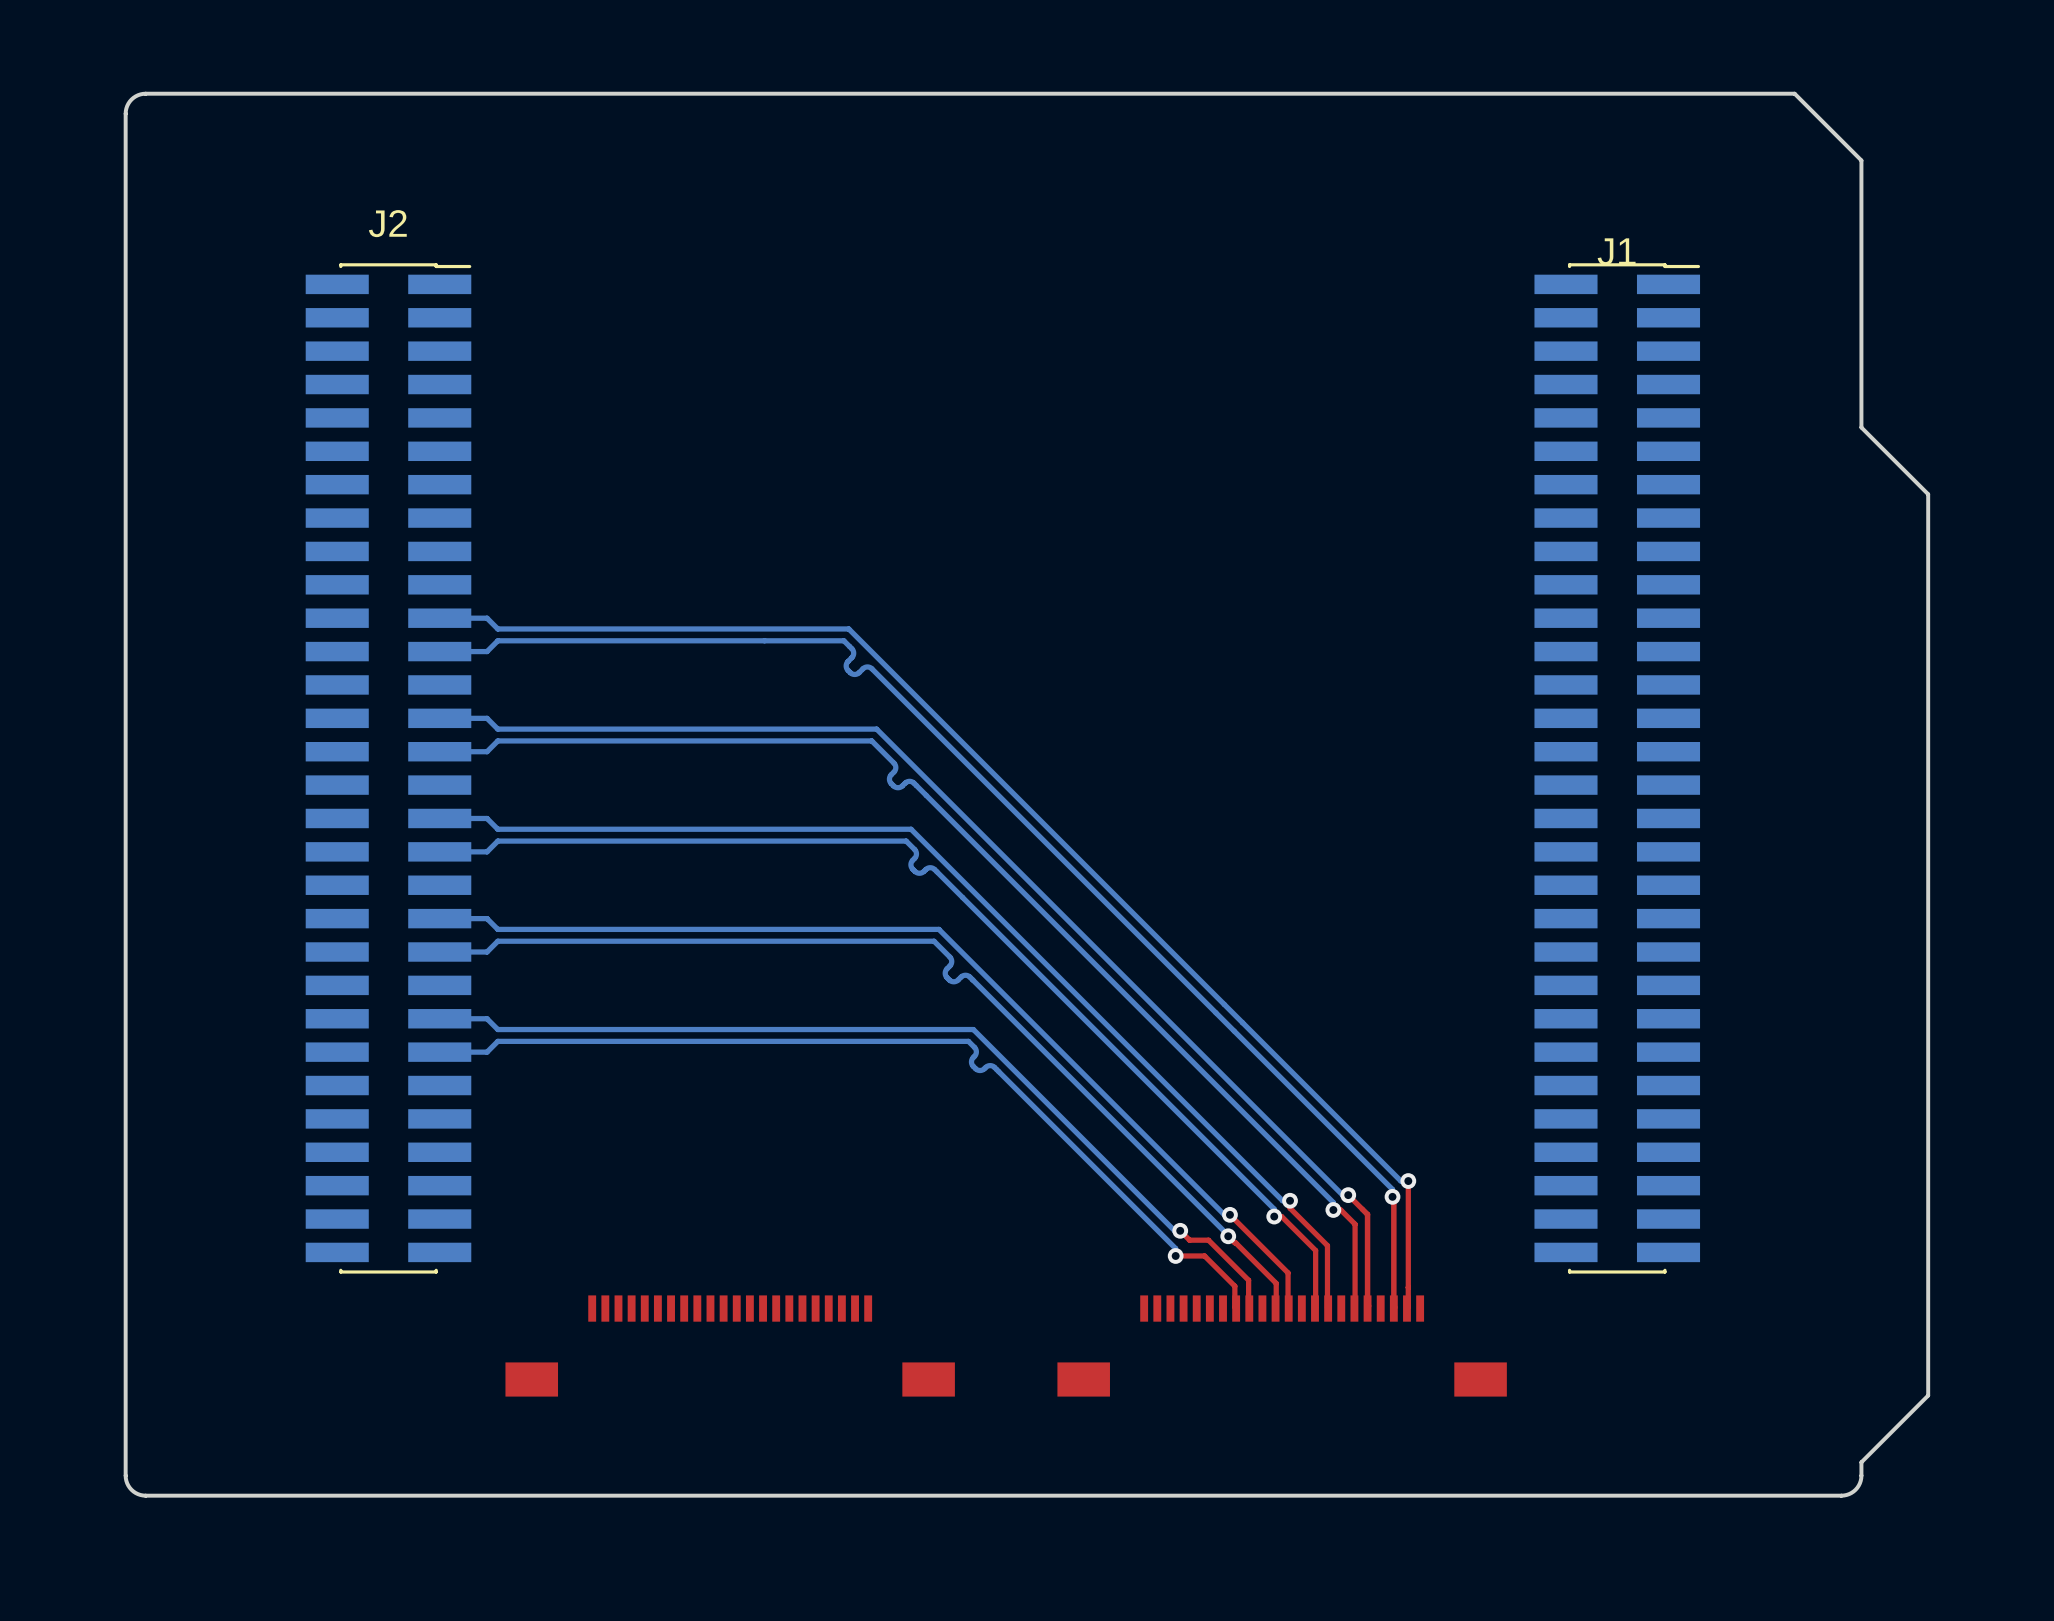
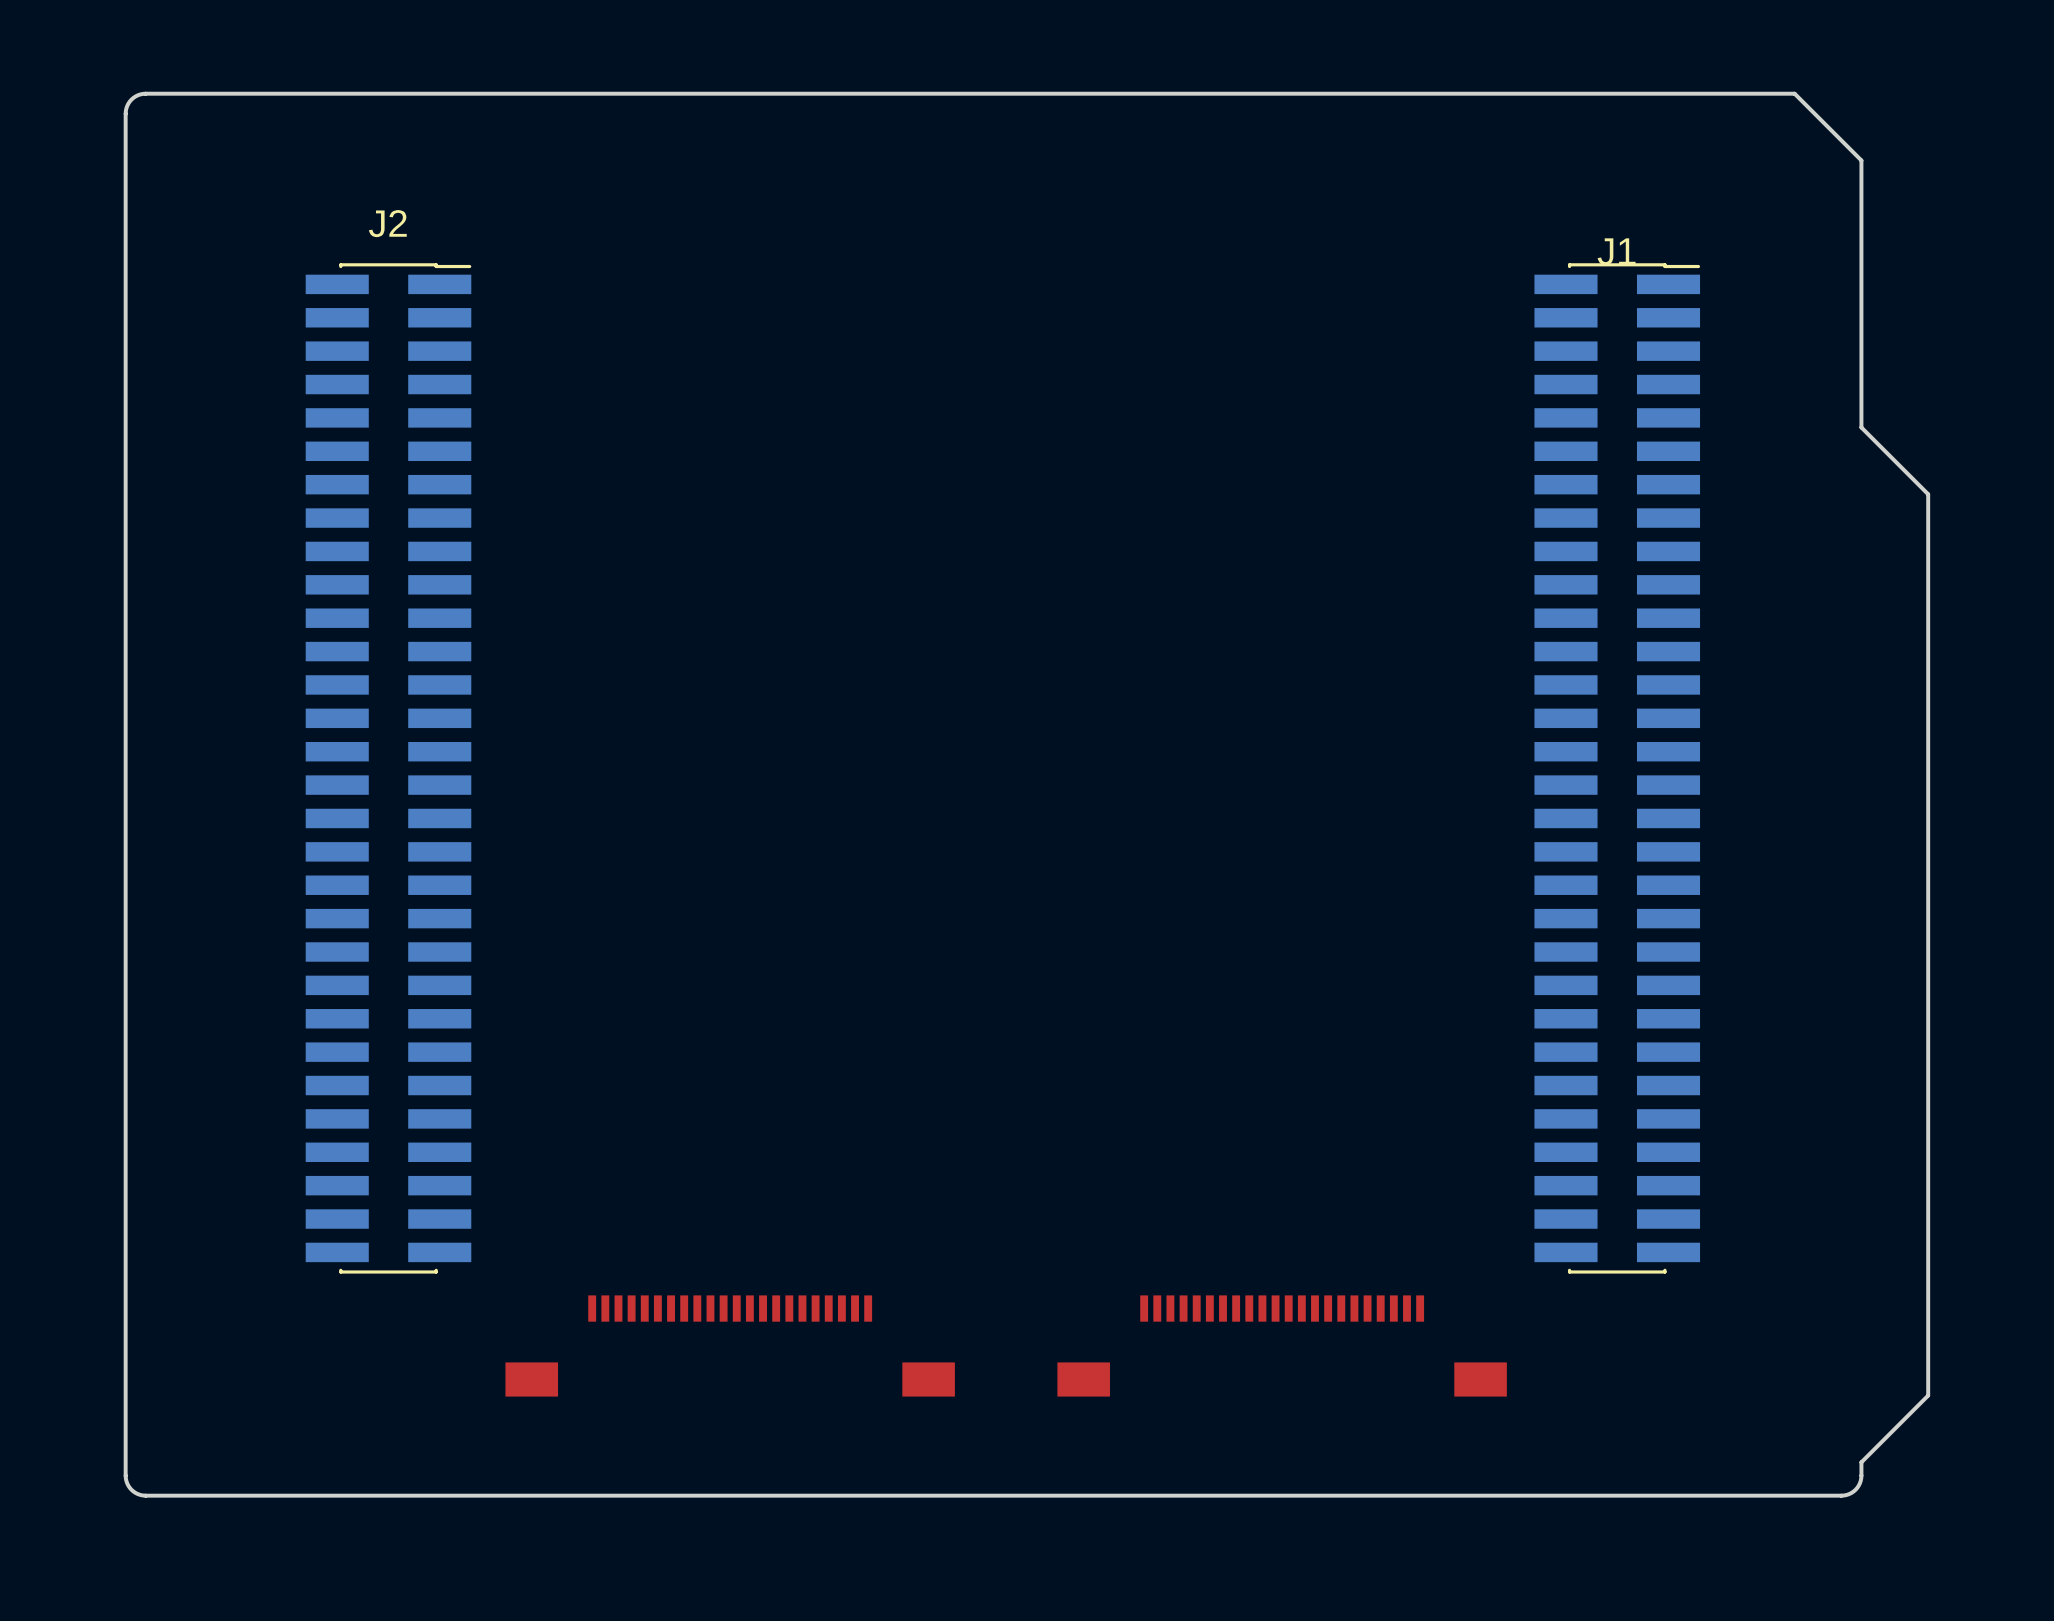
bottom track: (439, 618) (487, 618) (497, 628) (848, 628) (1400, 1181) (1408, 1181) -> none
bottom track: (439, 651) (487, 651) (497, 640) (843, 640) (853, 652) (846, 663) (848, 670) (855, 674) (865, 667) (871, 668) (1392, 1189) (1392, 1196) -> none
bottom track: (439, 718) (487, 718) (497, 729) (876, 729) (1342, 1195) (1348, 1195) -> none
bottom track: (439, 751) (487, 751) (497, 740) (871, 740) (895, 764) (895, 770) (889, 777) (891, 783) (898, 787) (907, 781) (914, 783) (1333, 1202) (1333, 1209) -> none
bottom track: (439, 818) (487, 818) (497, 829) (911, 829) (1282, 1200) (1290, 1200) -> none
bottom track: (439, 851) (487, 851) (497, 841) (906, 841) (916, 852) (911, 863) (912, 869) (919, 873) (928, 867) (934, 869) (1274, 1209) (1274, 1216) -> none
bottom track: (439, 918) (487, 918) (497, 929) (938, 929) (1224, 1214) (1229, 1214) -> none
bottom track: (439, 952) (487, 952) (497, 941) (934, 941) (951, 959) (951, 964) (945, 971) (947, 977) (953, 981) (963, 975) (969, 977) (1228, 1236) -> none
bottom track: (439, 1018) (487, 1018) (497, 1029) (973, 1029) (1174, 1230) (1180, 1230) -> none
bottom track: (439, 1052) (487, 1052) (497, 1041) (968, 1041) (976, 1050) (971, 1060) (973, 1066) (980, 1070) (988, 1065) (994, 1067) (1175, 1248) (1175, 1255) -> none
via: (1408, 1181) -> none
top track: (1348, 1195) (1367, 1214) (1367, 1308) (1368, 1305) -> none
via: (1348, 1195) -> none
top track: (1392, 1196) (1393, 1308) (1395, 1307) -> none
via: (1392, 1196) -> none
top track: (1290, 1200) (1290, 1208) (1327, 1245) (1328, 1308) -> none
via: (1290, 1200) -> none
top track: (1333, 1209) (1340, 1209) (1355, 1224) (1354, 1308) -> none
via: (1333, 1209) -> none
top track: (1229, 1214) (1288, 1272) (1288, 1308) -> none
via: (1229, 1214) -> none
top track: (1274, 1216) (1281, 1216) (1315, 1250) (1314, 1308) -> none
via: (1274, 1216) -> none
top track: (1180, 1230) (1189, 1240) (1208, 1240) (1248, 1280) (1249, 1308) -> none
via: (1180, 1230) -> none
top track: (1228, 1236) (1276, 1283) (1275, 1308) -> none
via: (1228, 1236) -> none
top track: (1175, 1255) (1204, 1255) (1234, 1286) (1236, 1308) -> none
via: (1175, 1255) -> none

